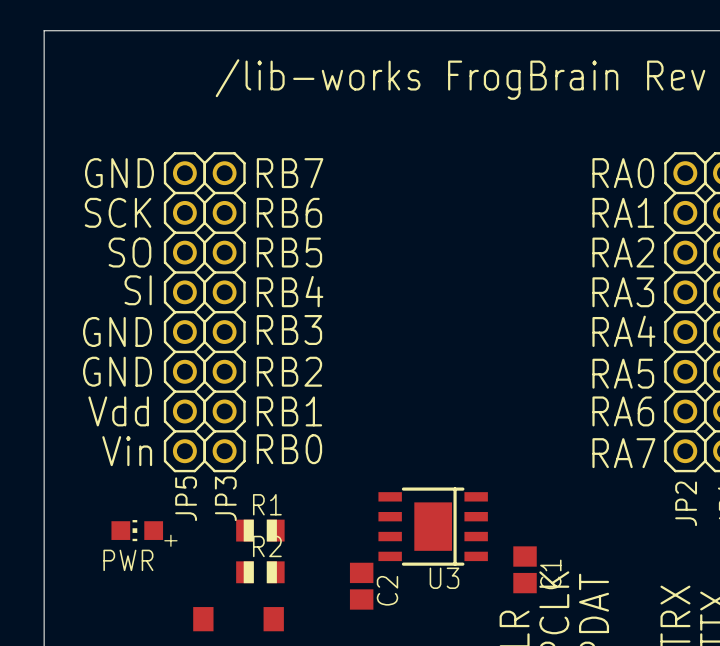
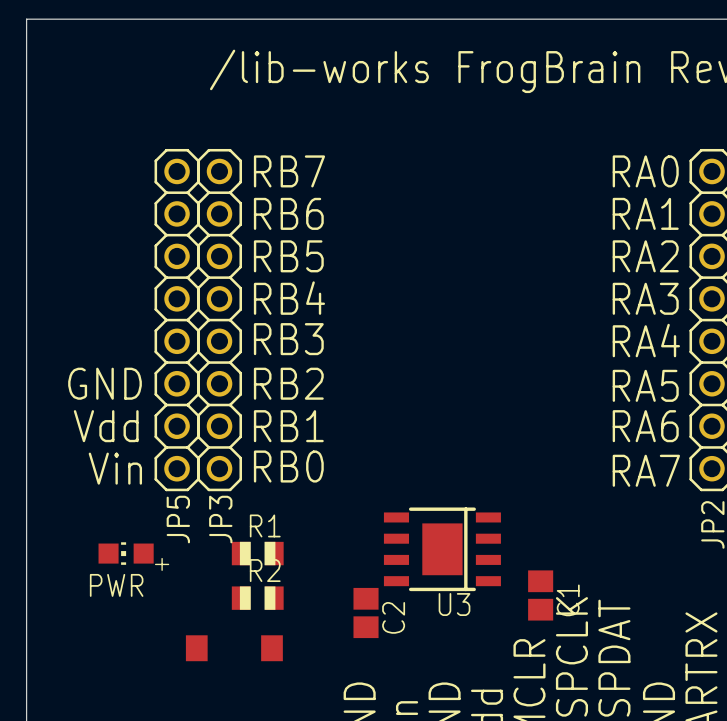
text: GND (119, 173) -> none
text: SCK (118, 212) -> none
text: SO (129, 252) -> none
text: SI (138, 290) -> none
text: GND (117, 331) -> none

